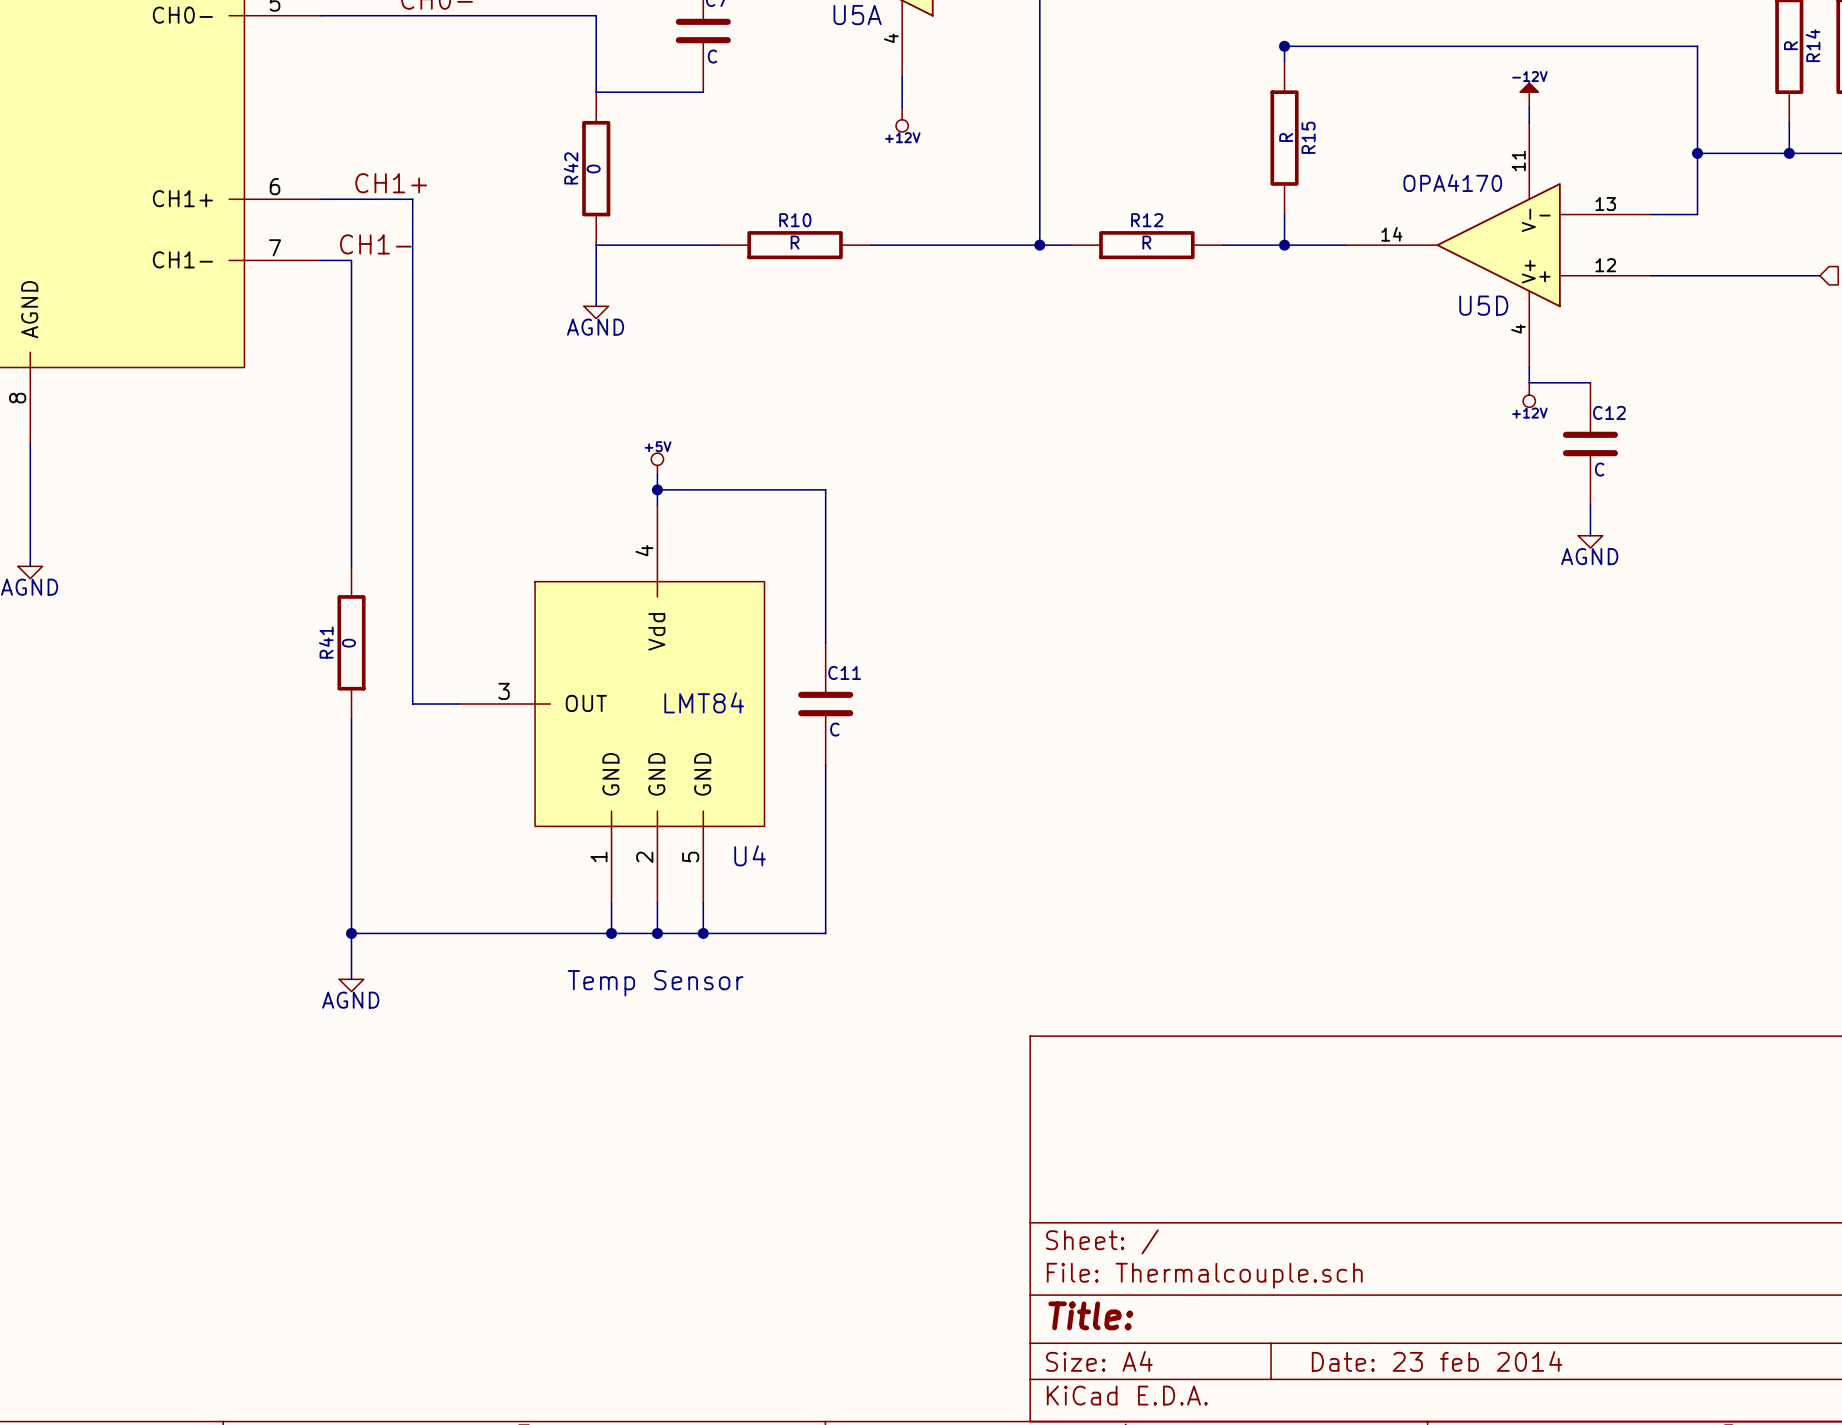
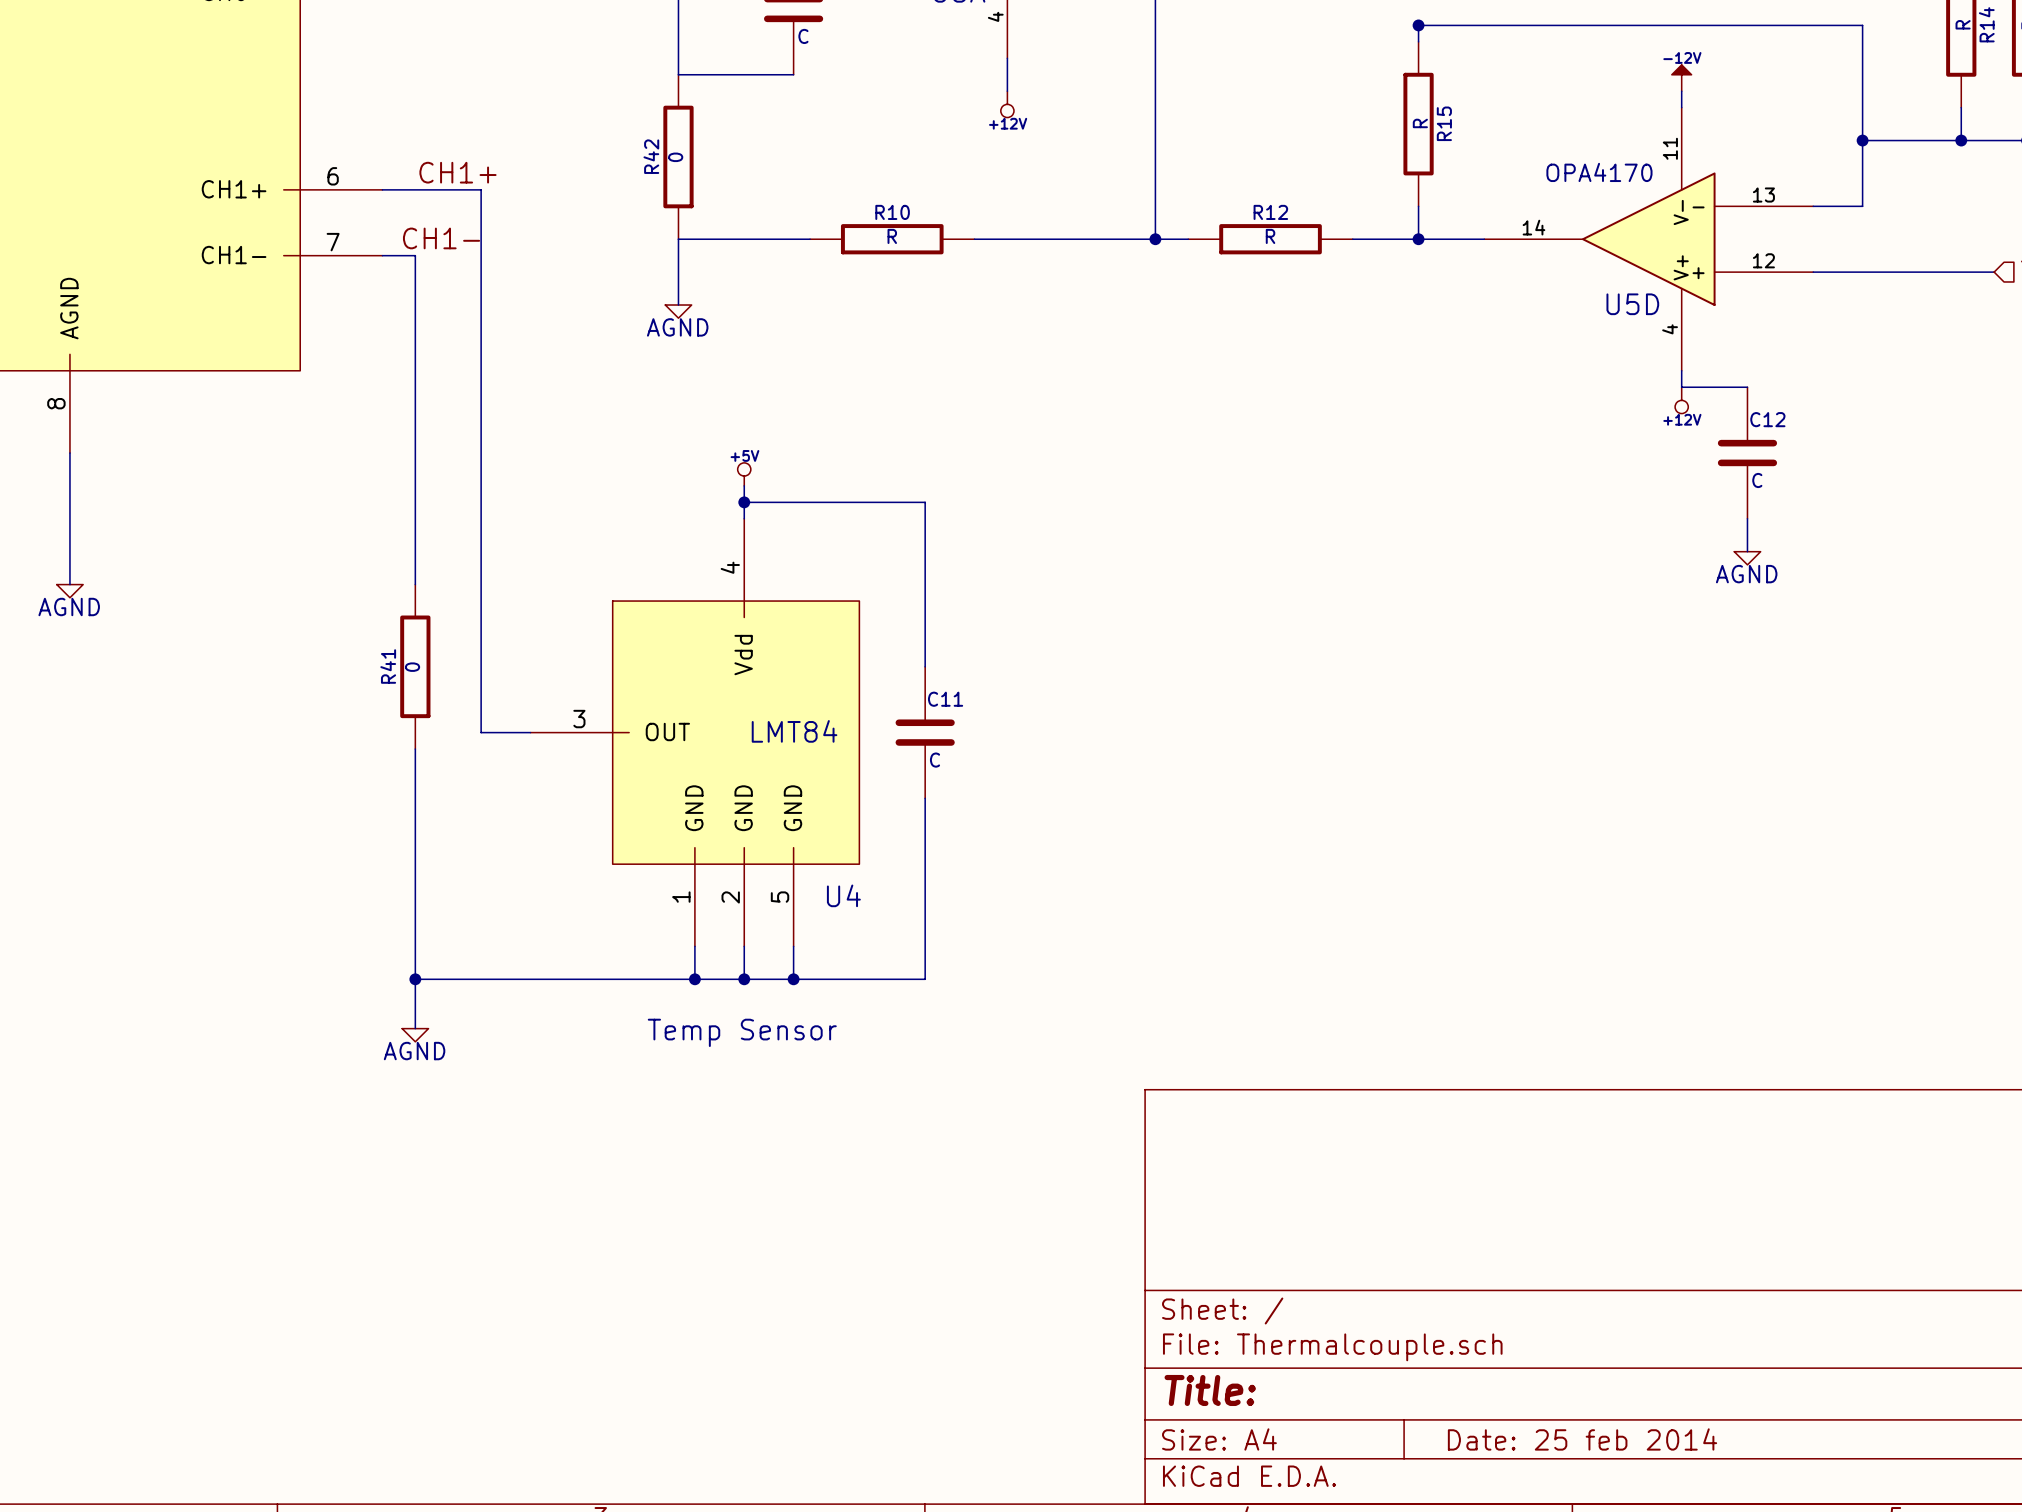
title block: Date: 23 feb 2014 (1437, 1361) -> Date: 25 feb 2014 (1582, 1439)

